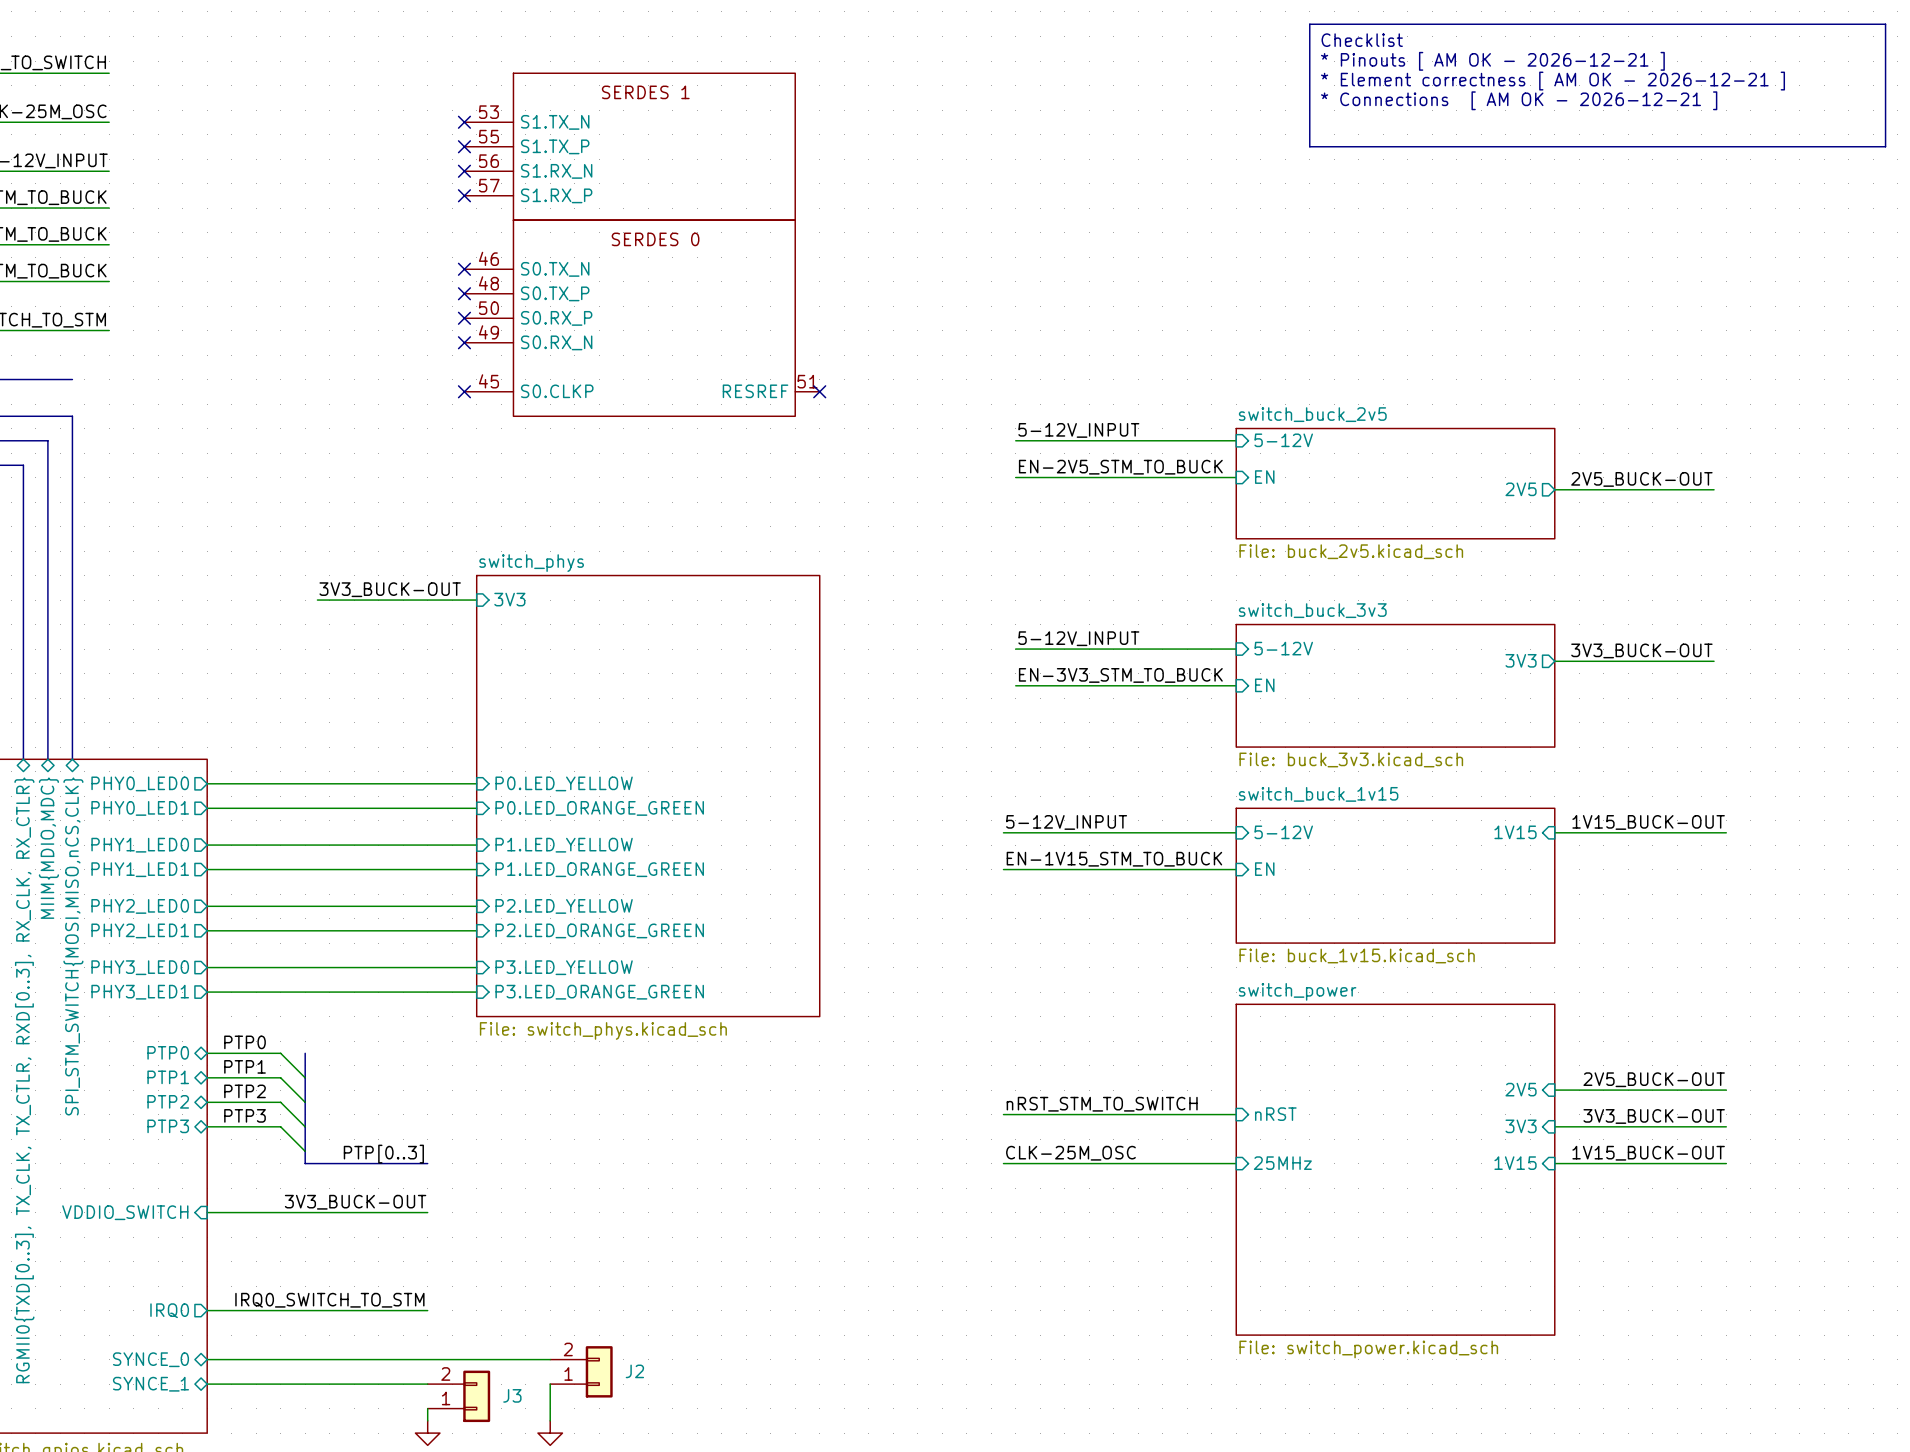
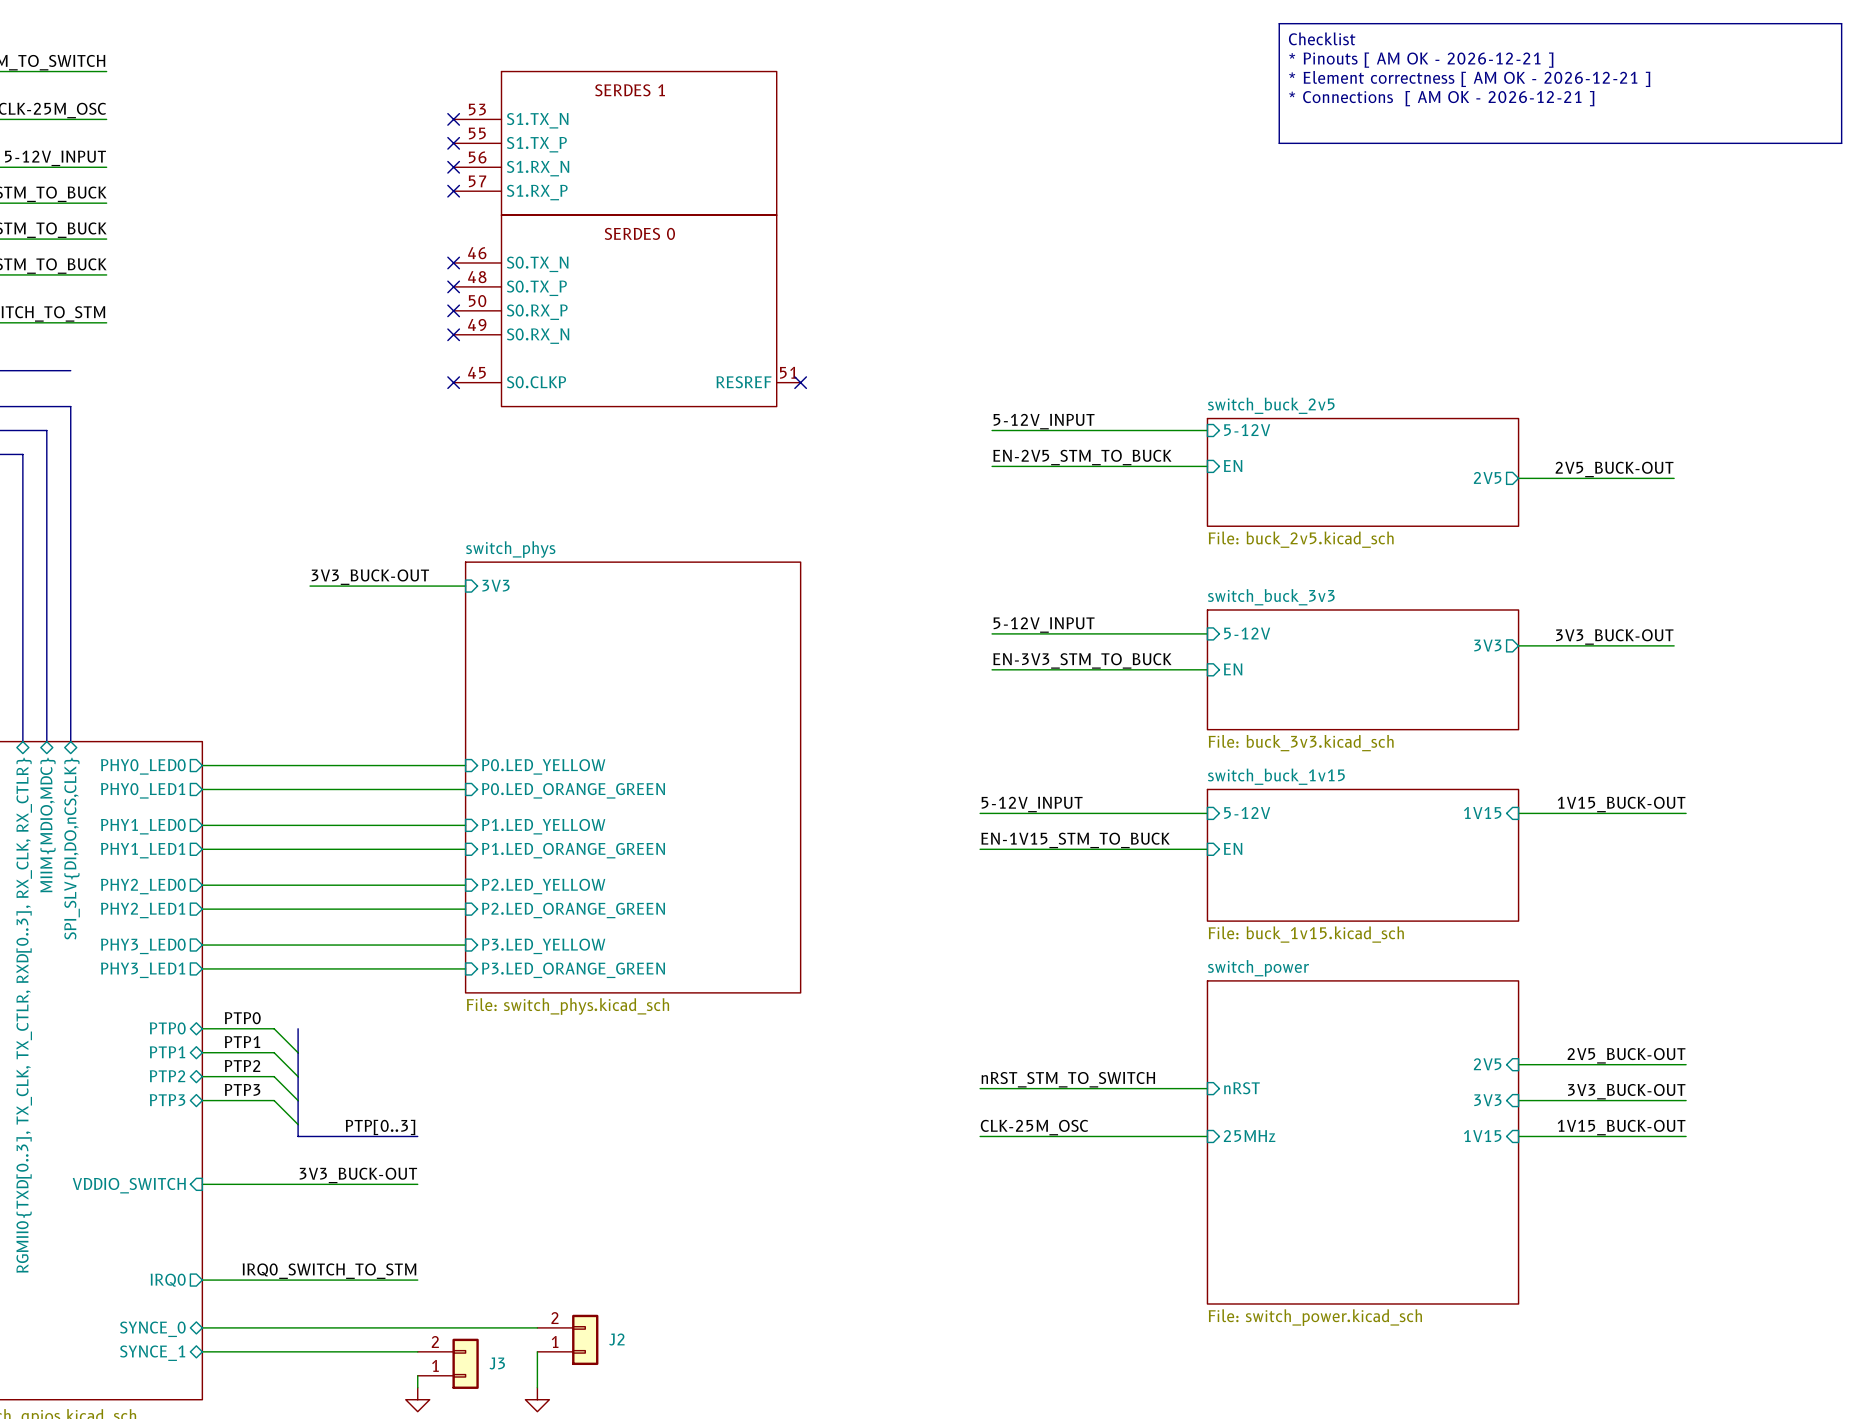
sheet pin: SPI_STM_SWITCH{MOSI,MISO,nCS,CLK} (73, 946) -> SPI_SLV{DI,DO,nCS,CLK} (72, 848)

